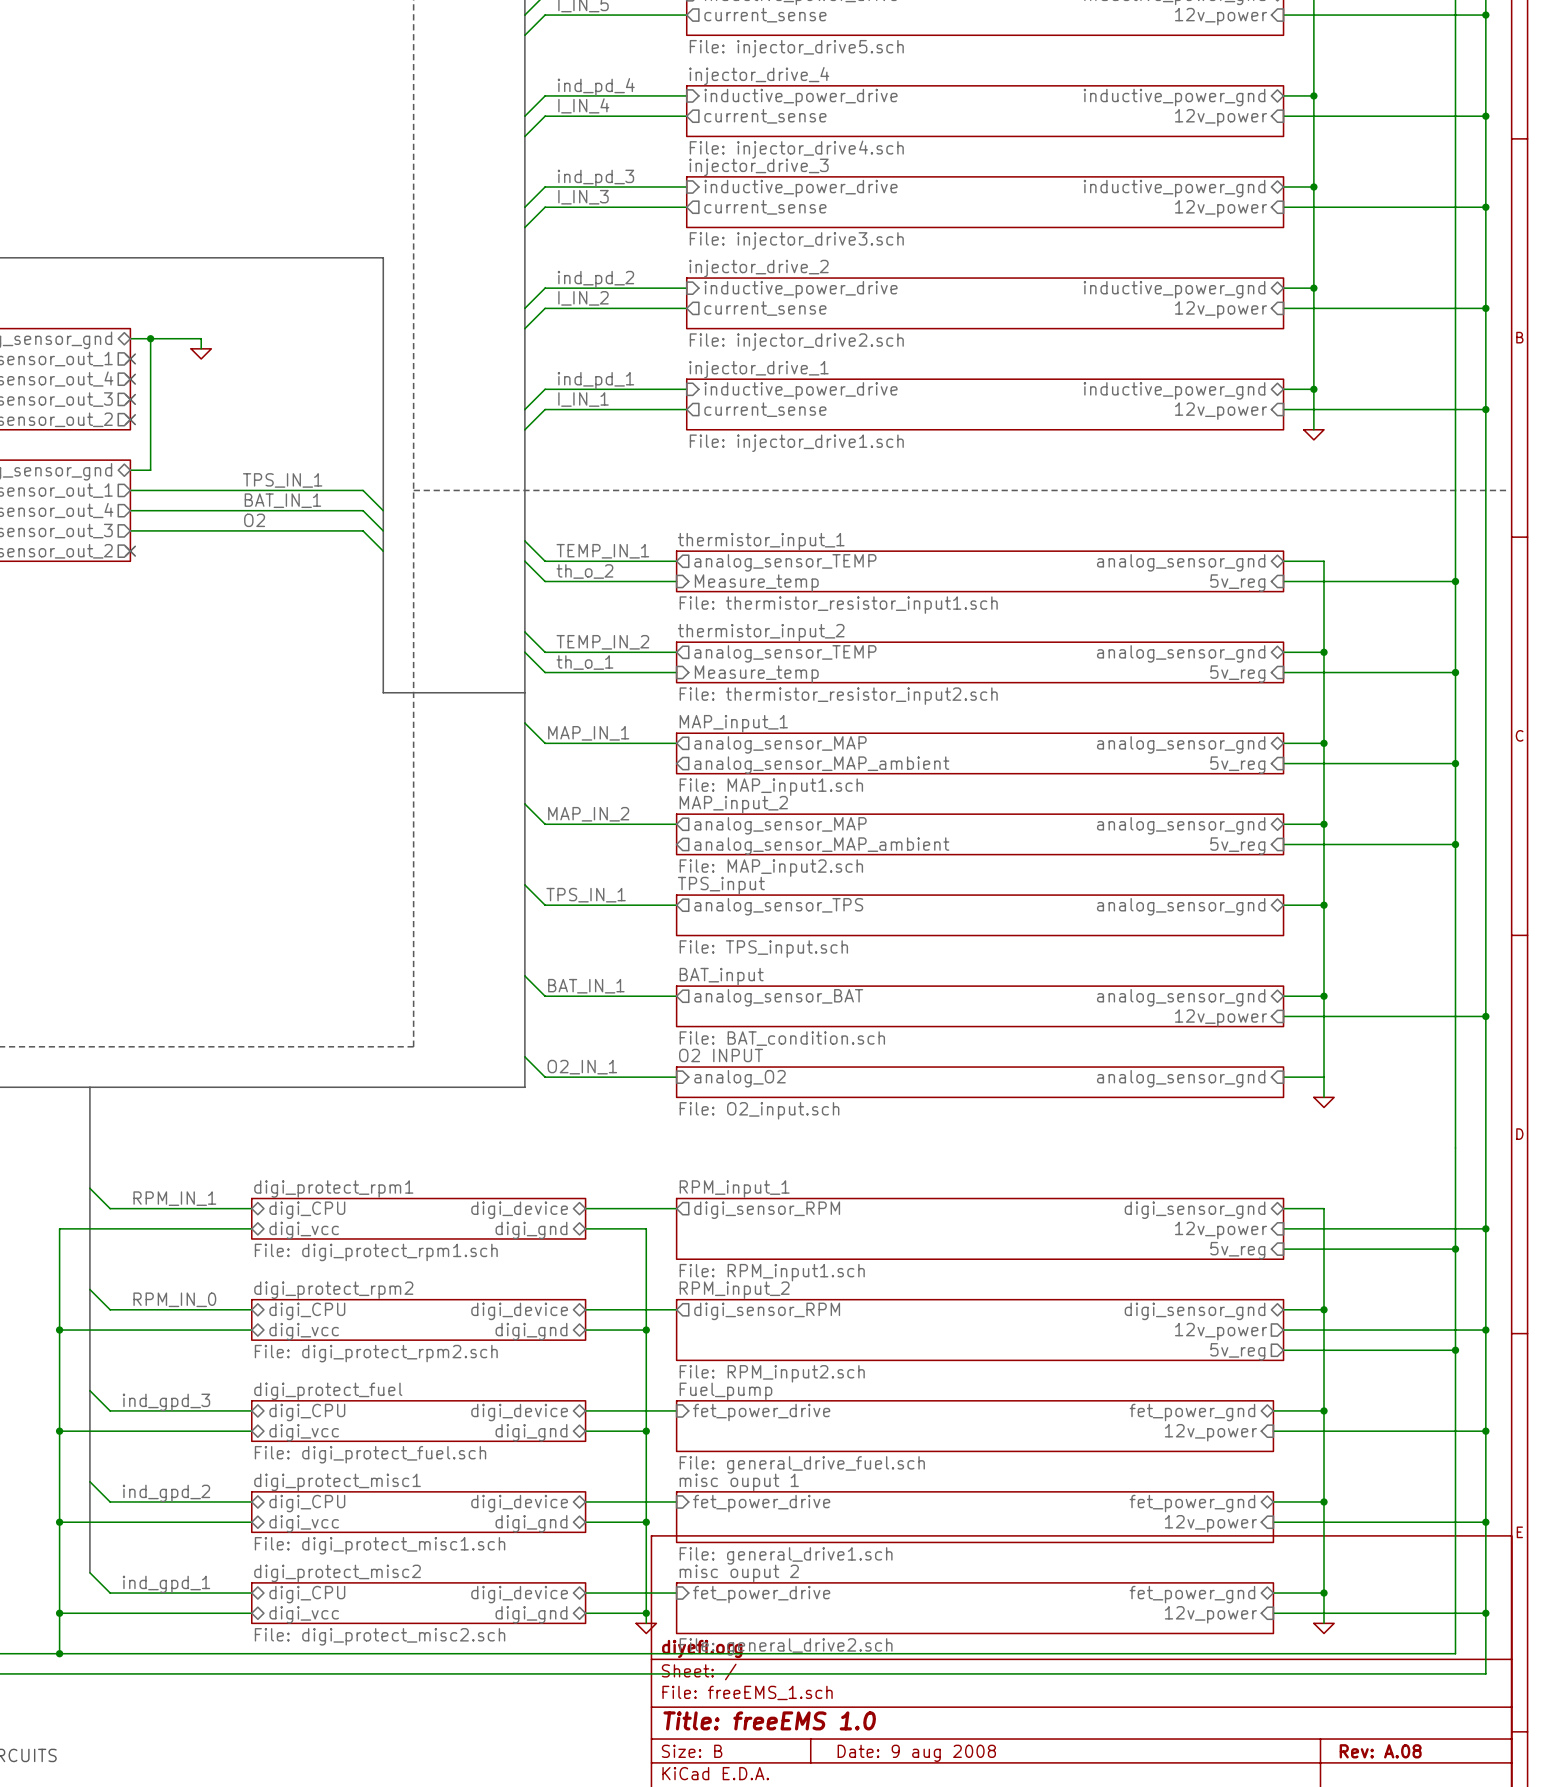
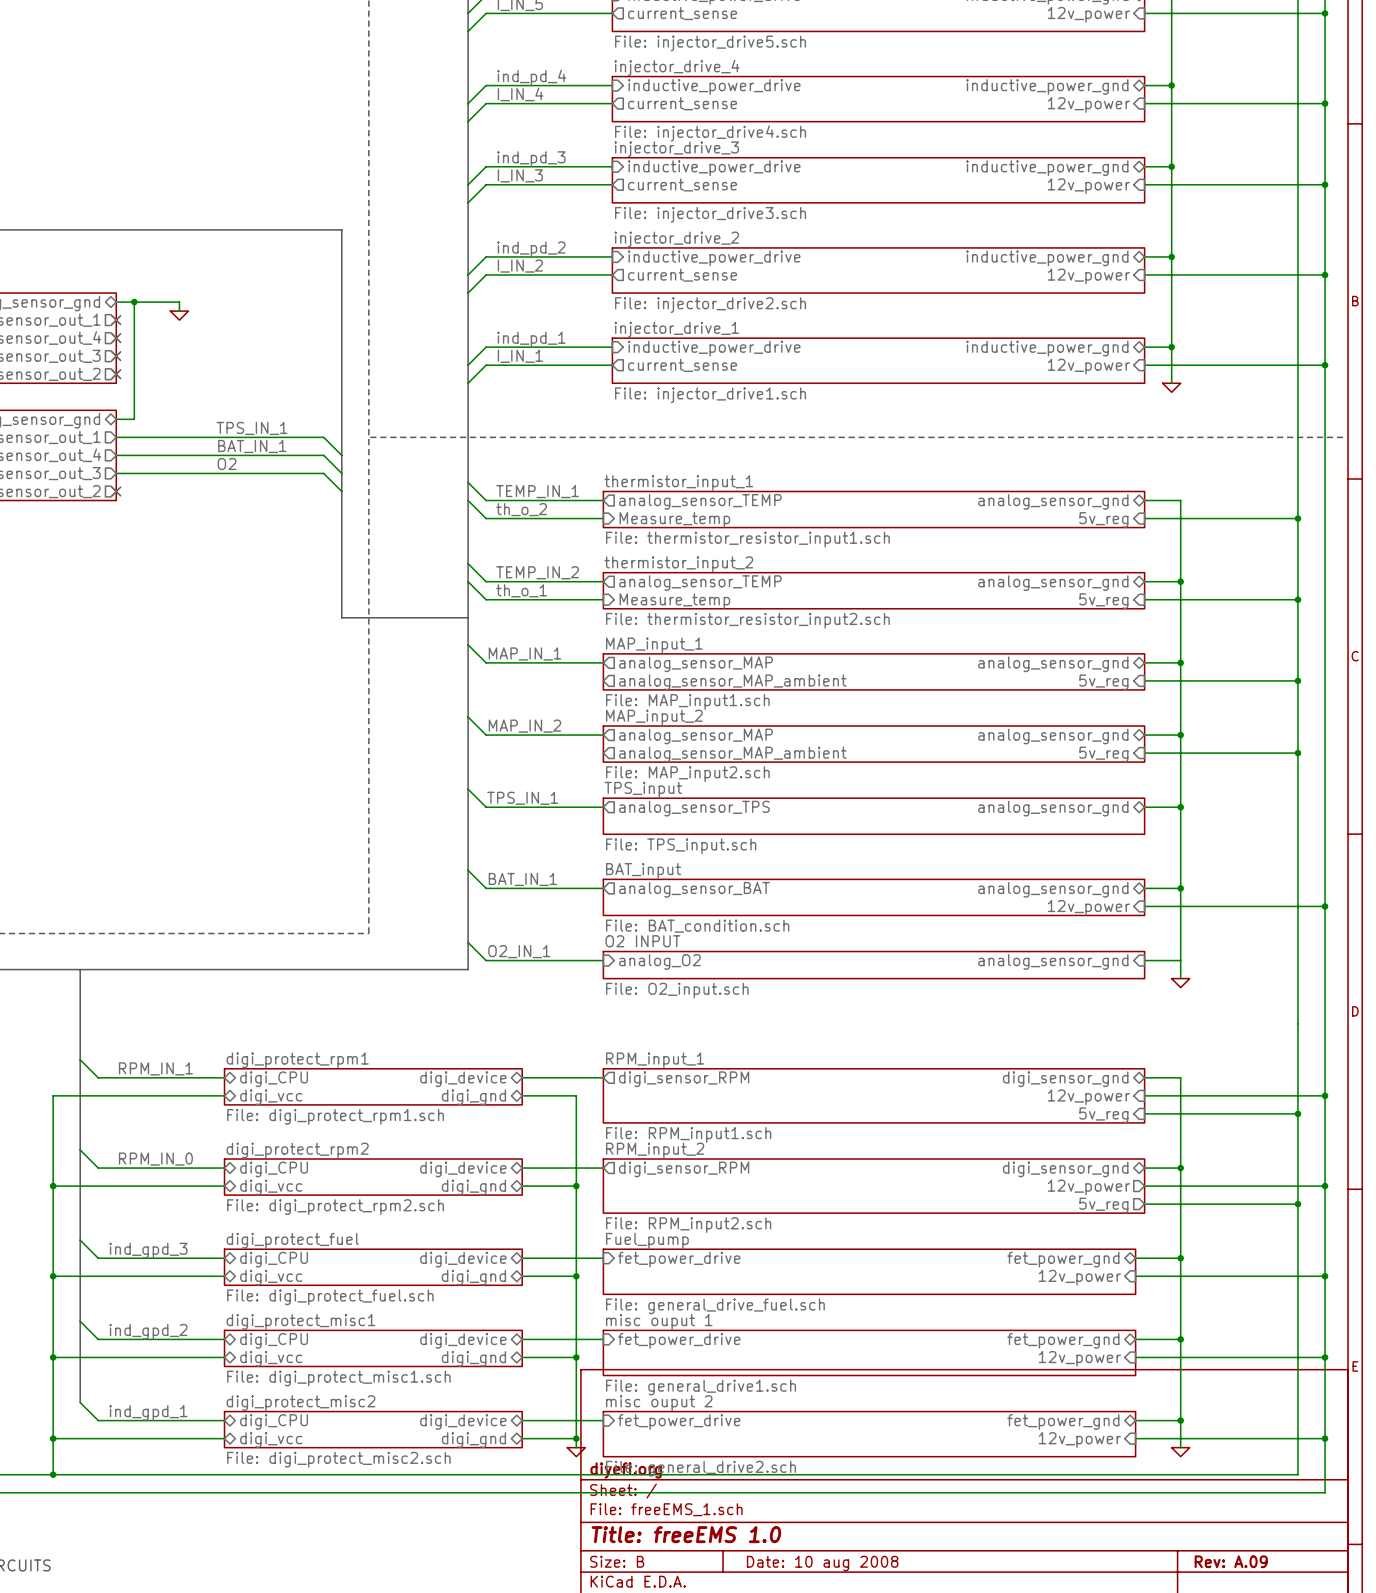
title block: Rev: A.08 (1380, 1751) -> Rev: A.09 (1231, 1561)
title block: Date: 9 aug 2008 (916, 1753) -> Date: 10 aug 2008 (822, 1563)

